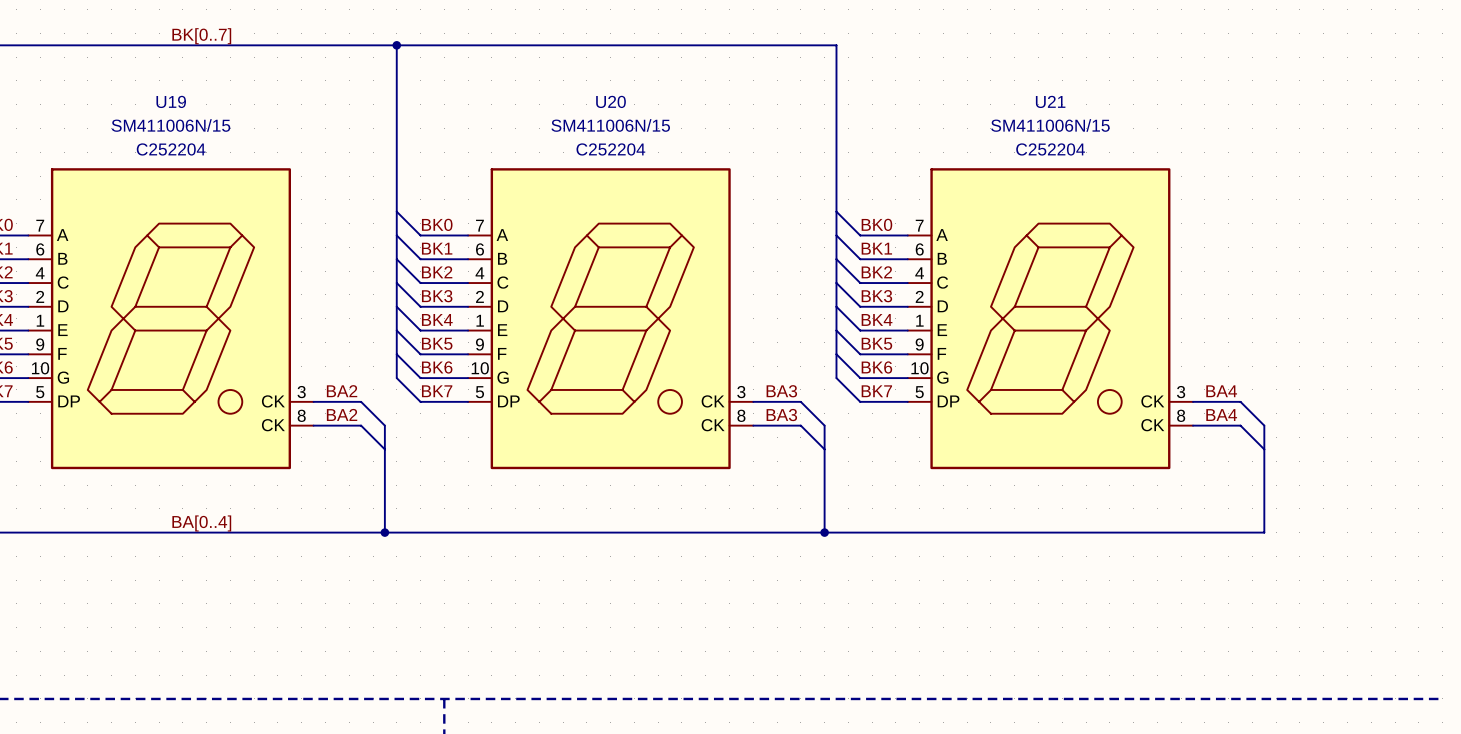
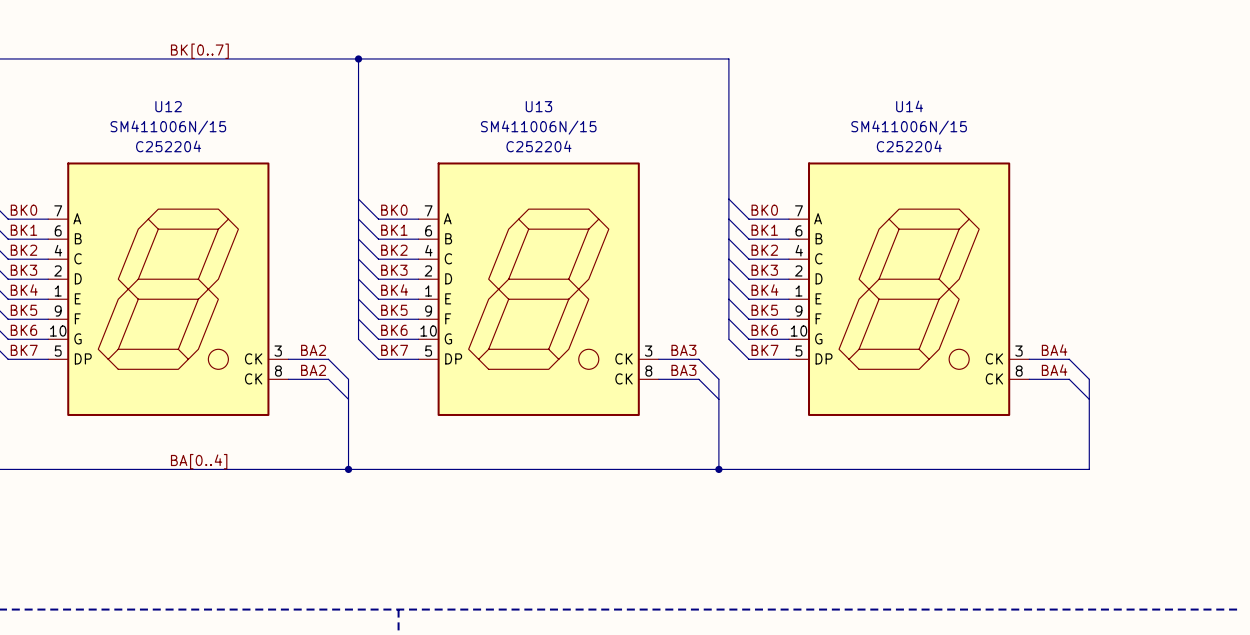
U19 name: U19 (171, 101) -> U12 (168, 106)
U20 name: U20 (611, 101) -> U13 (538, 106)
U21 name: U21 (1050, 101) -> U14 (909, 106)

